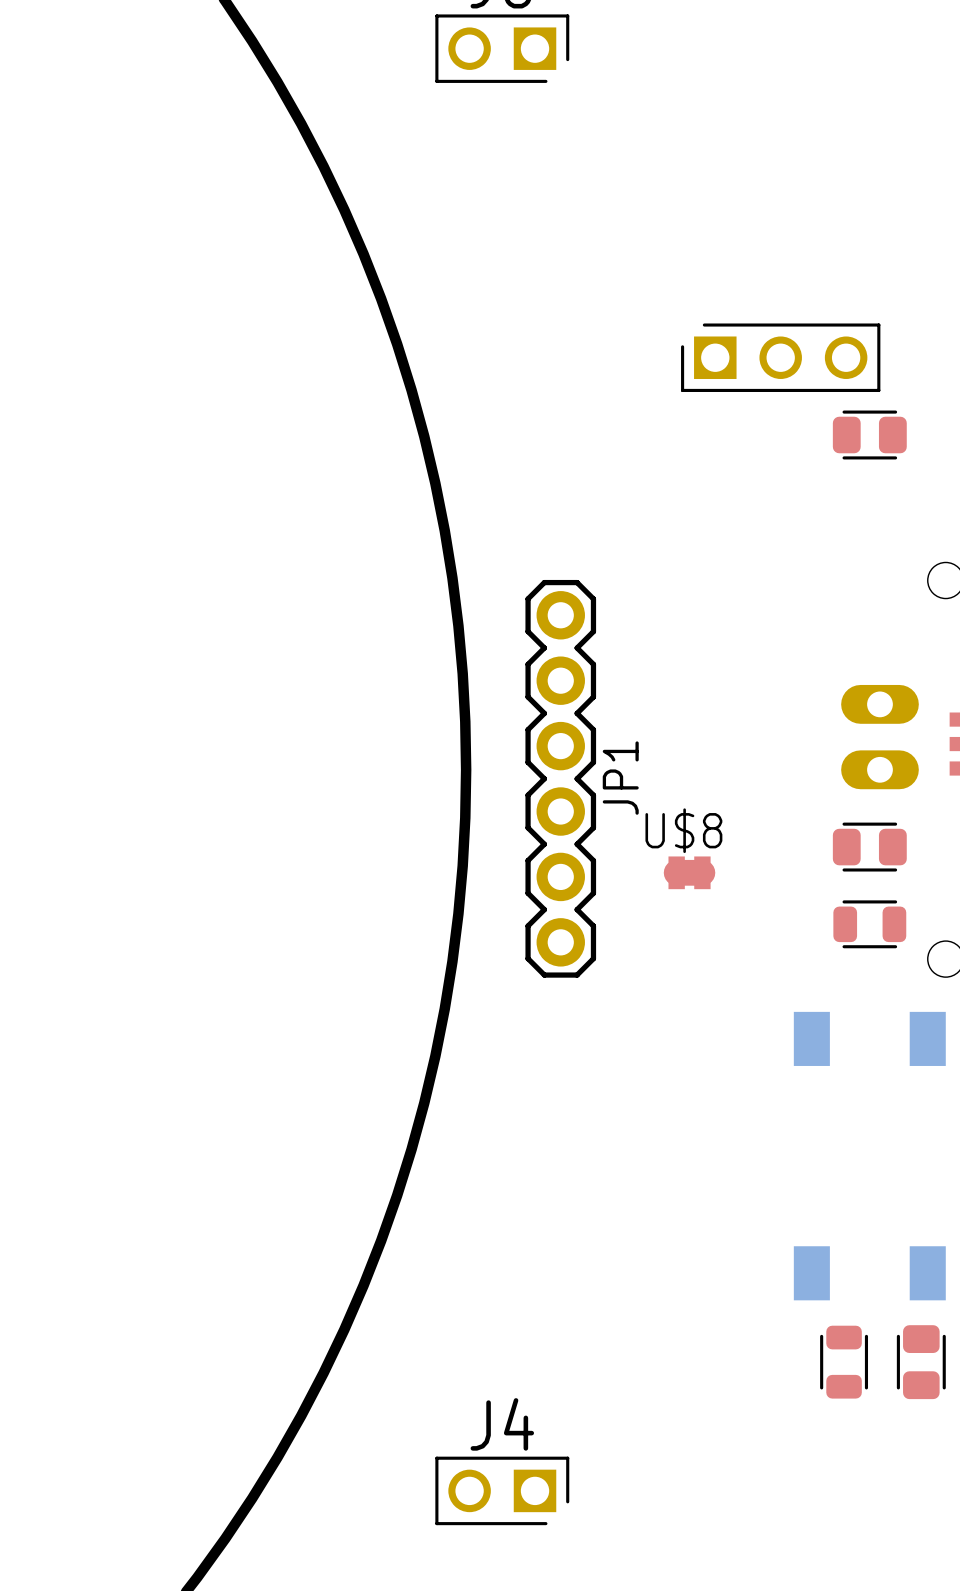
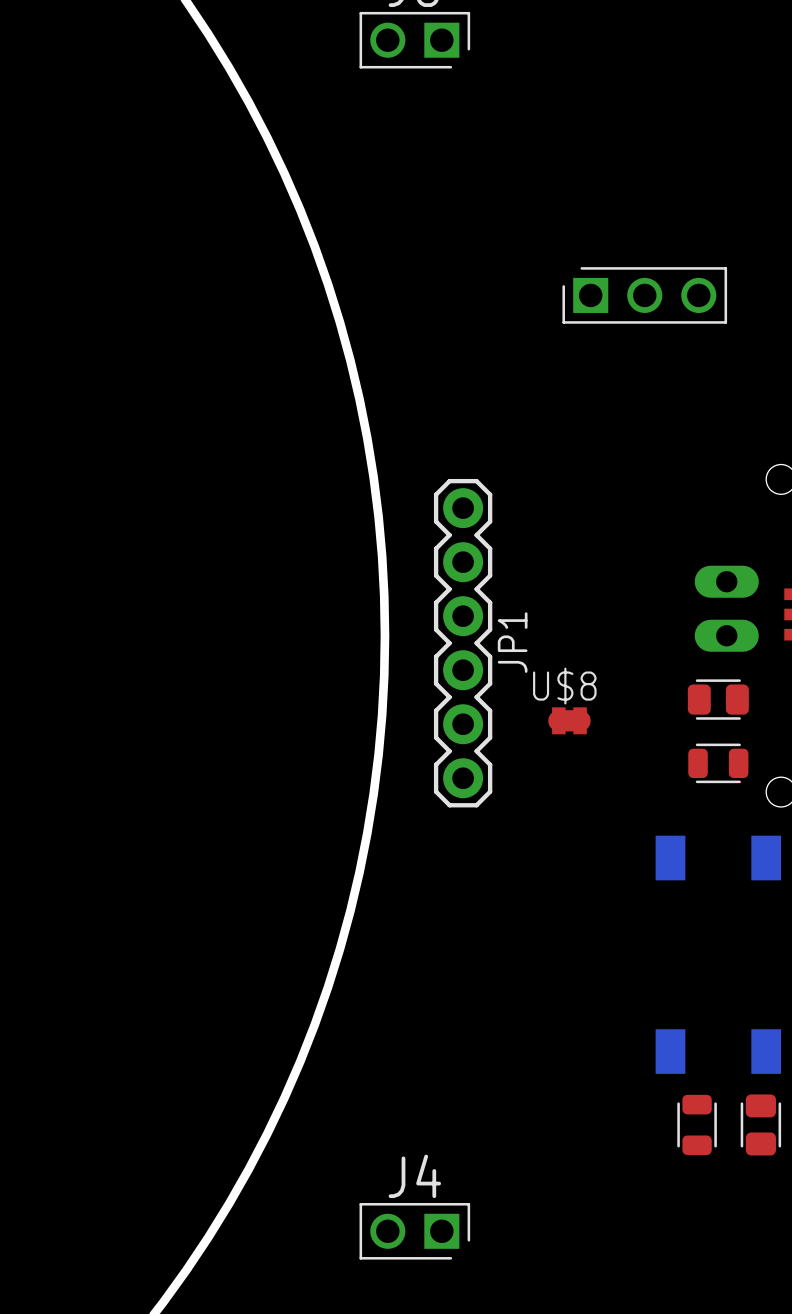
part: (869, 434) -> none

